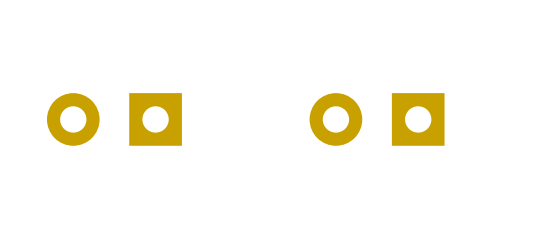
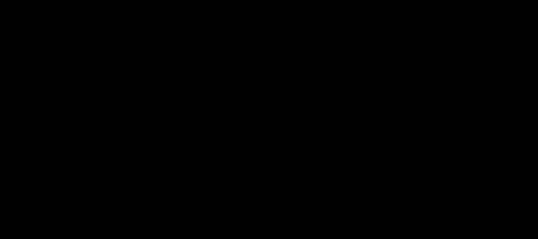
part: (114, 119) -> none
part: (377, 119) -> none

